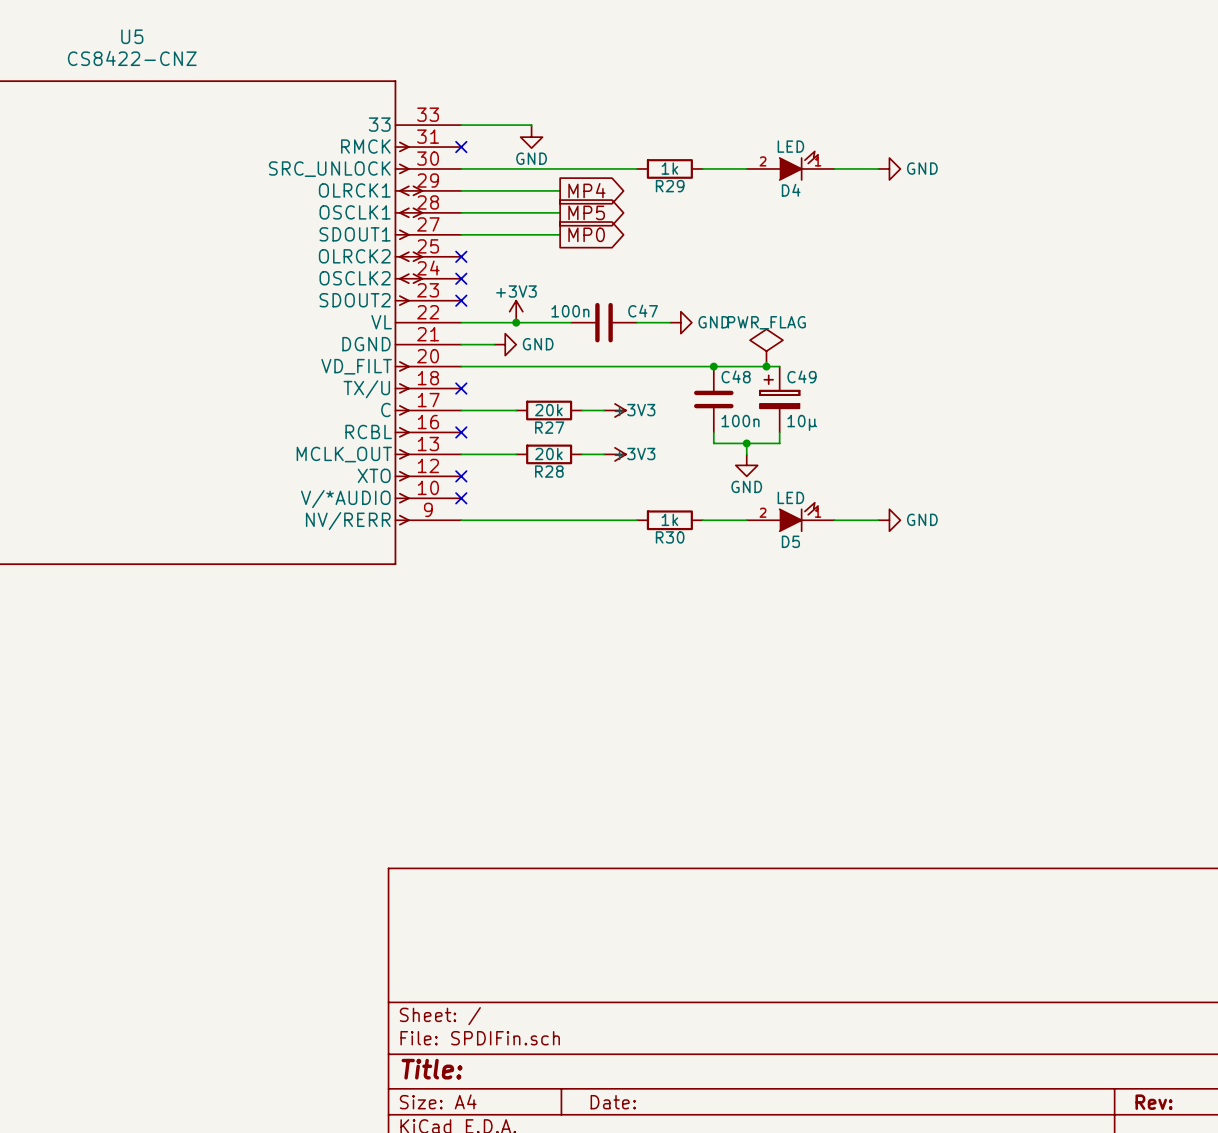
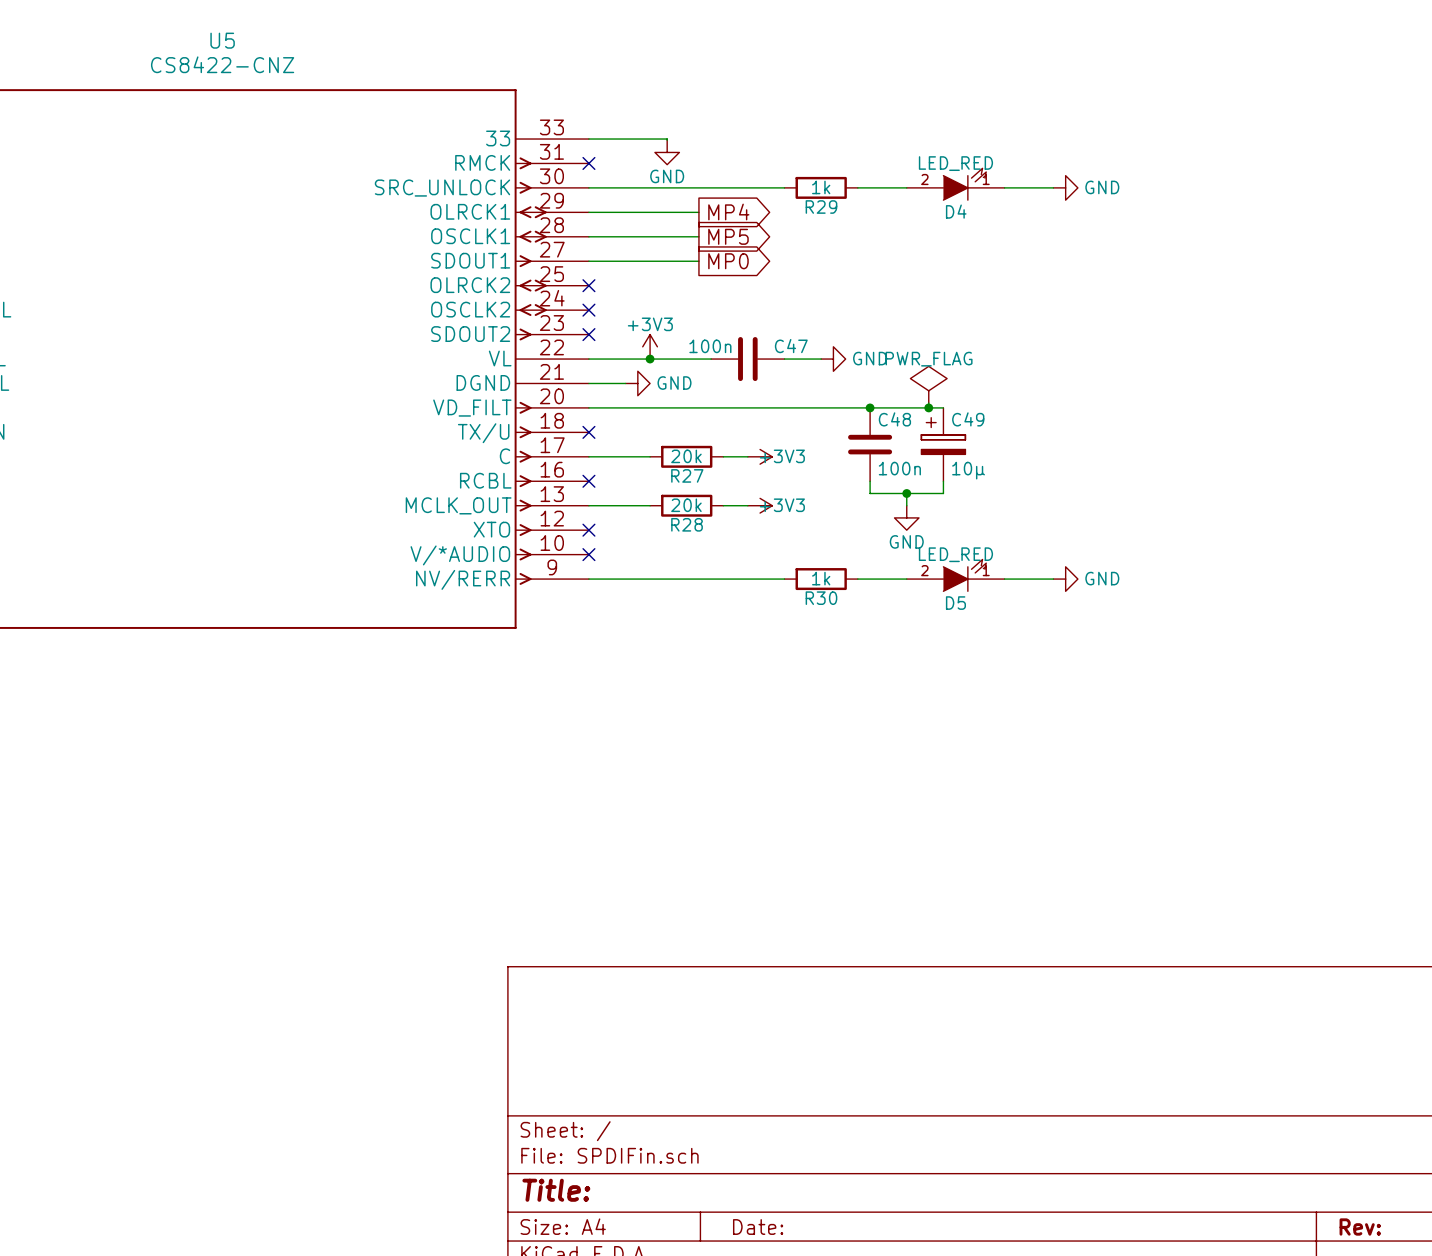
D4 value: LED (790, 146) -> LED_RED (955, 163)
D5 value: LED (790, 497) -> LED_RED (955, 554)

